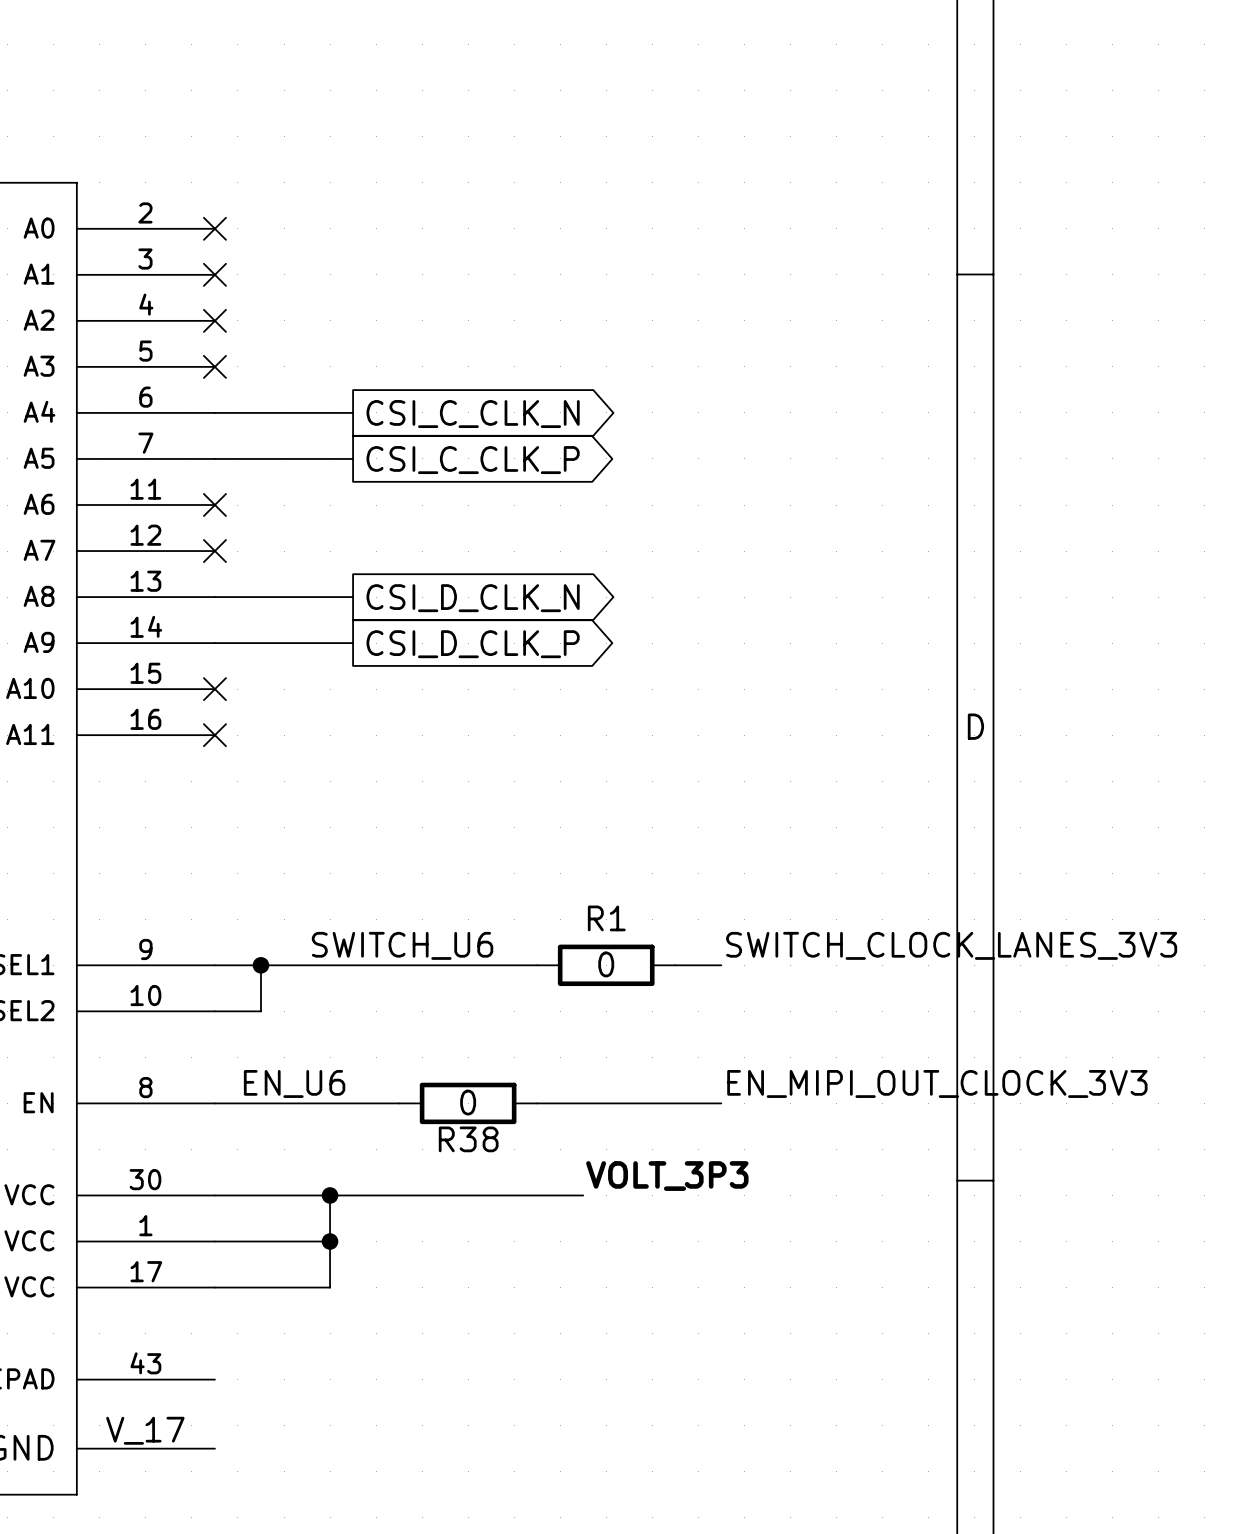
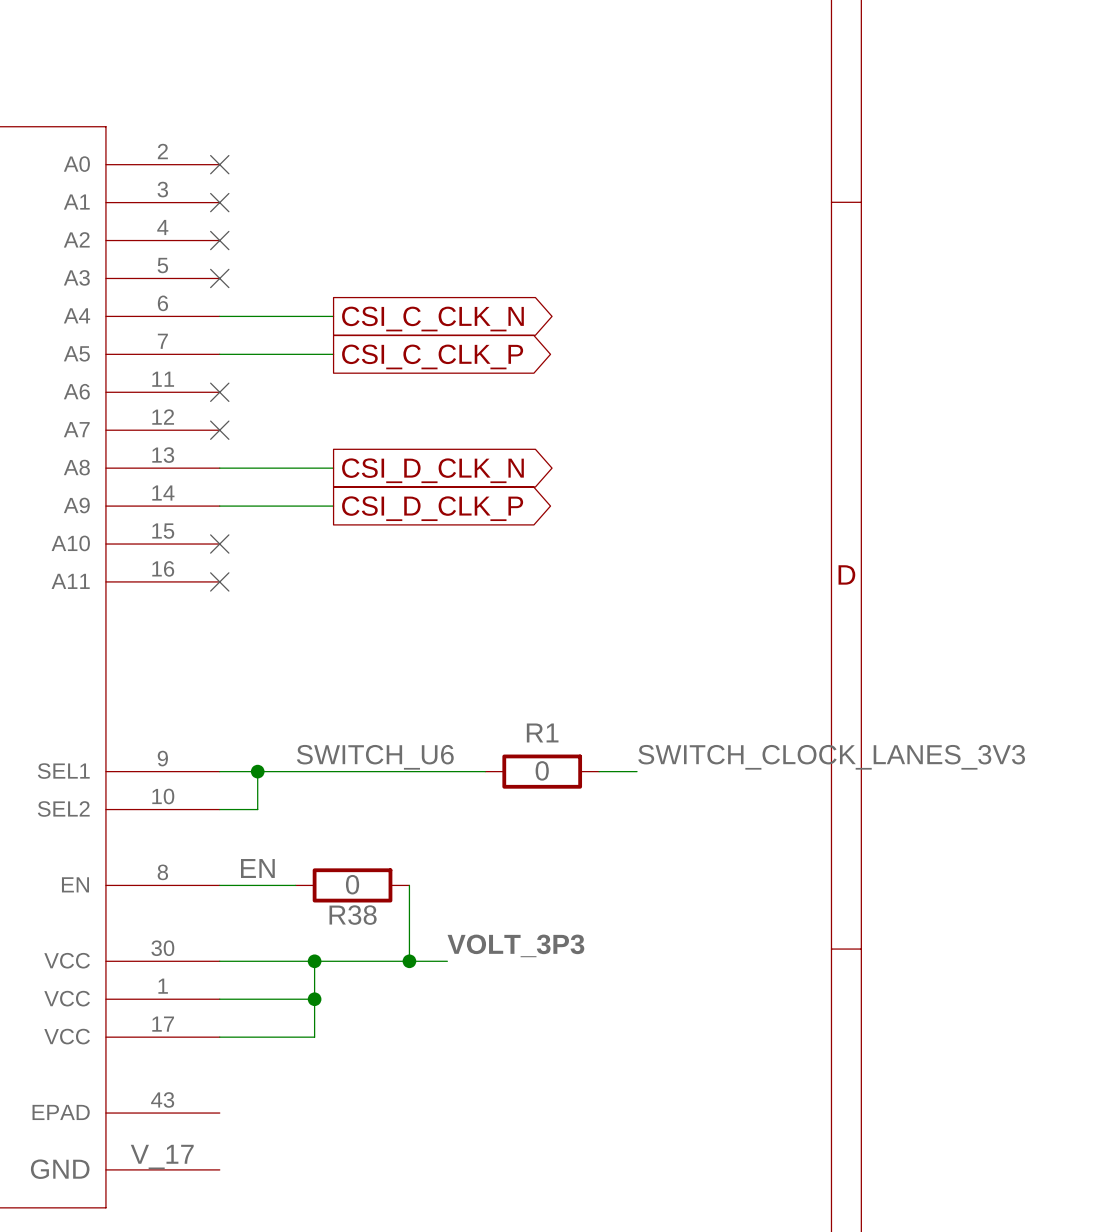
label: EN_U6 (294, 1083) -> EN (257, 868)
label: EN_MIPI_OUT_CLOCK_3V3 (937, 1083) -> none
wire: (307, 1103) (399, 1103) -> none
wire: none -> (409, 885) (409, 961)
R38 position: (468, 1103) -> (352, 885)
wire: (537, 1103) (721, 1103) -> none
label position: VOLT_3P3 (667, 1176) -> VOLT_3P3 (515, 945)
junction: none -> (409, 961)
wire: (491, 1195) (583, 1195) -> none

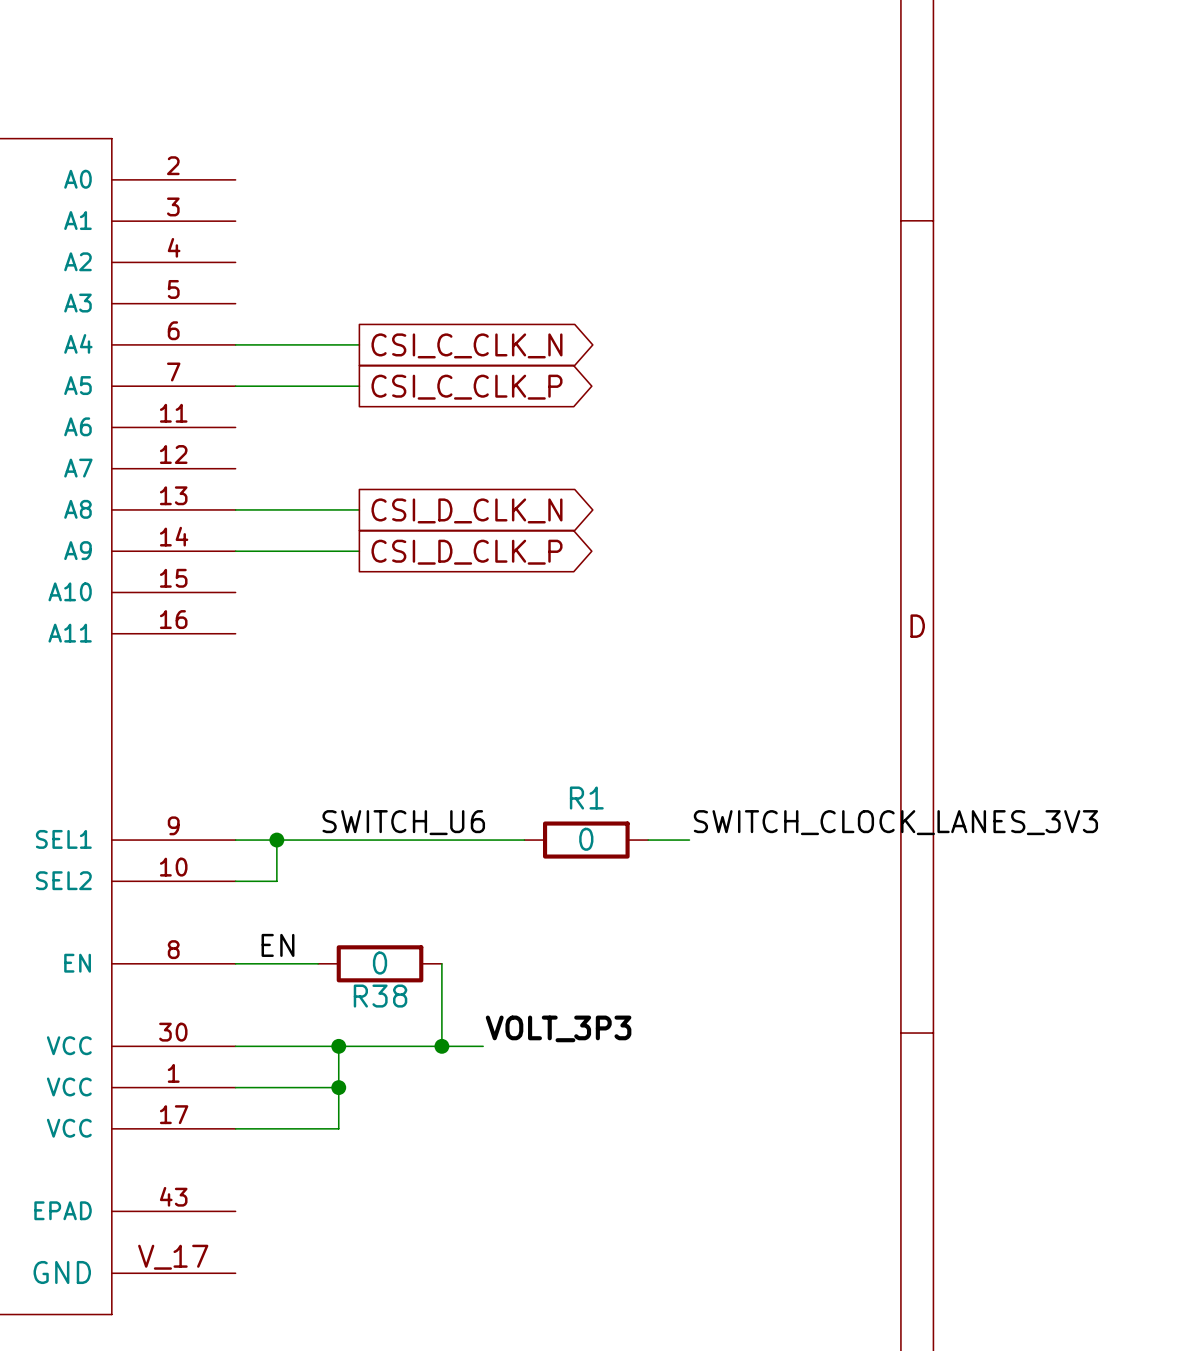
no-connect mark: (219, 164) -> none
no-connect mark: (219, 202) -> none
no-connect mark: (219, 240) -> none
no-connect mark: (219, 278) -> none
no-connect mark: (219, 392) -> none
no-connect mark: (219, 430) -> none
no-connect mark: (219, 544) -> none
no-connect mark: (219, 581) -> none

